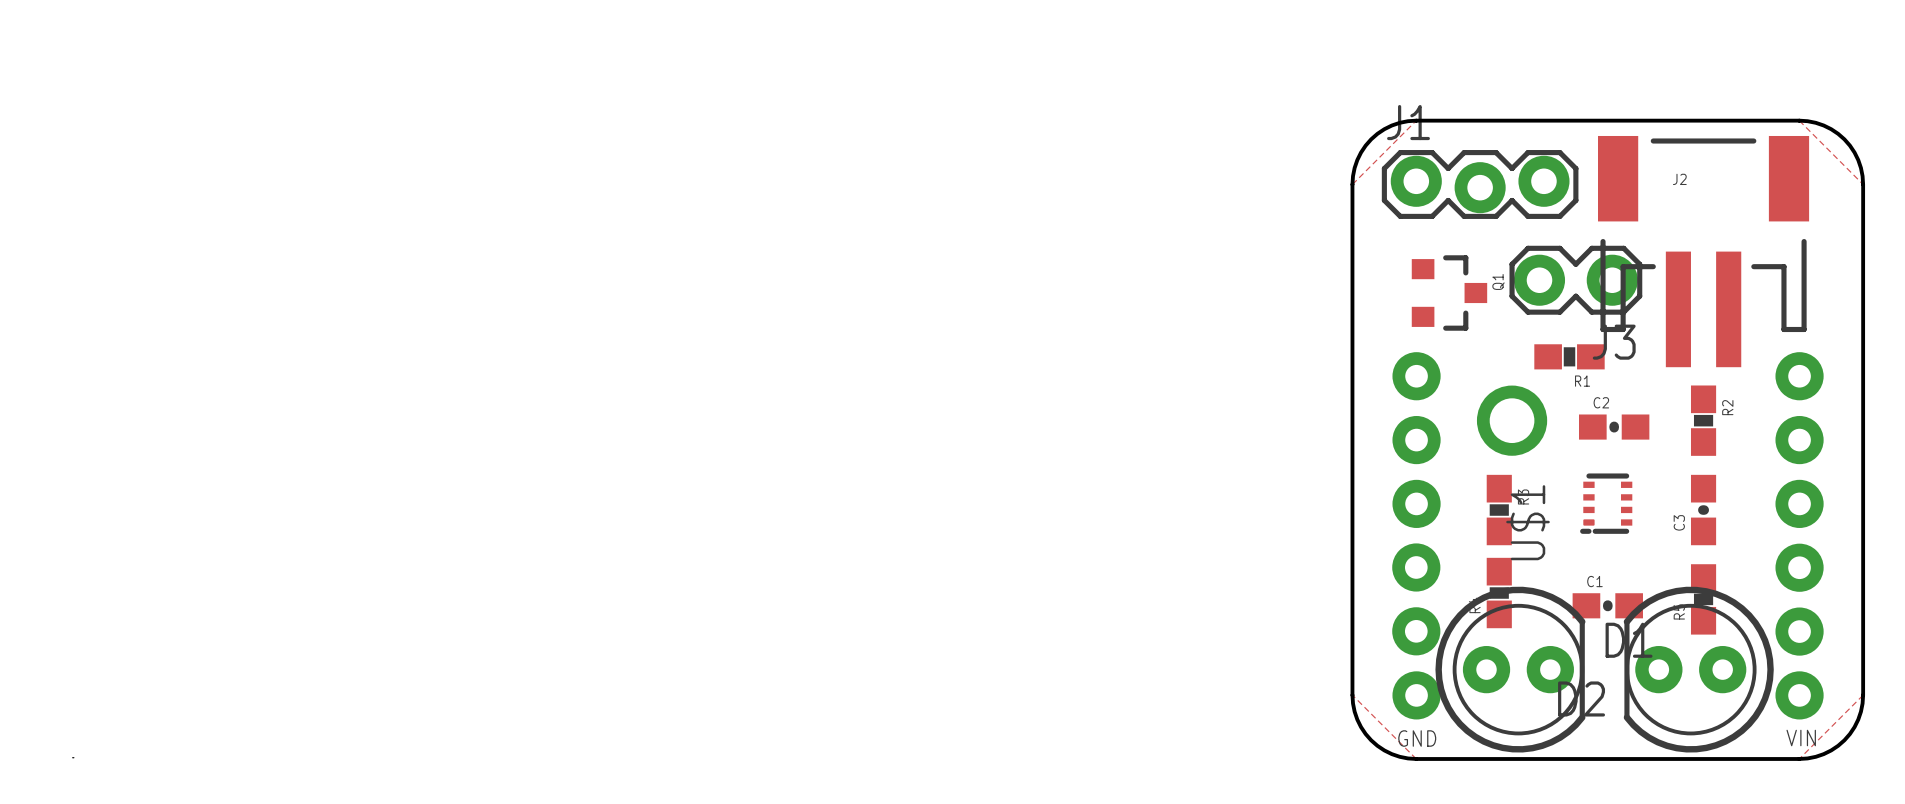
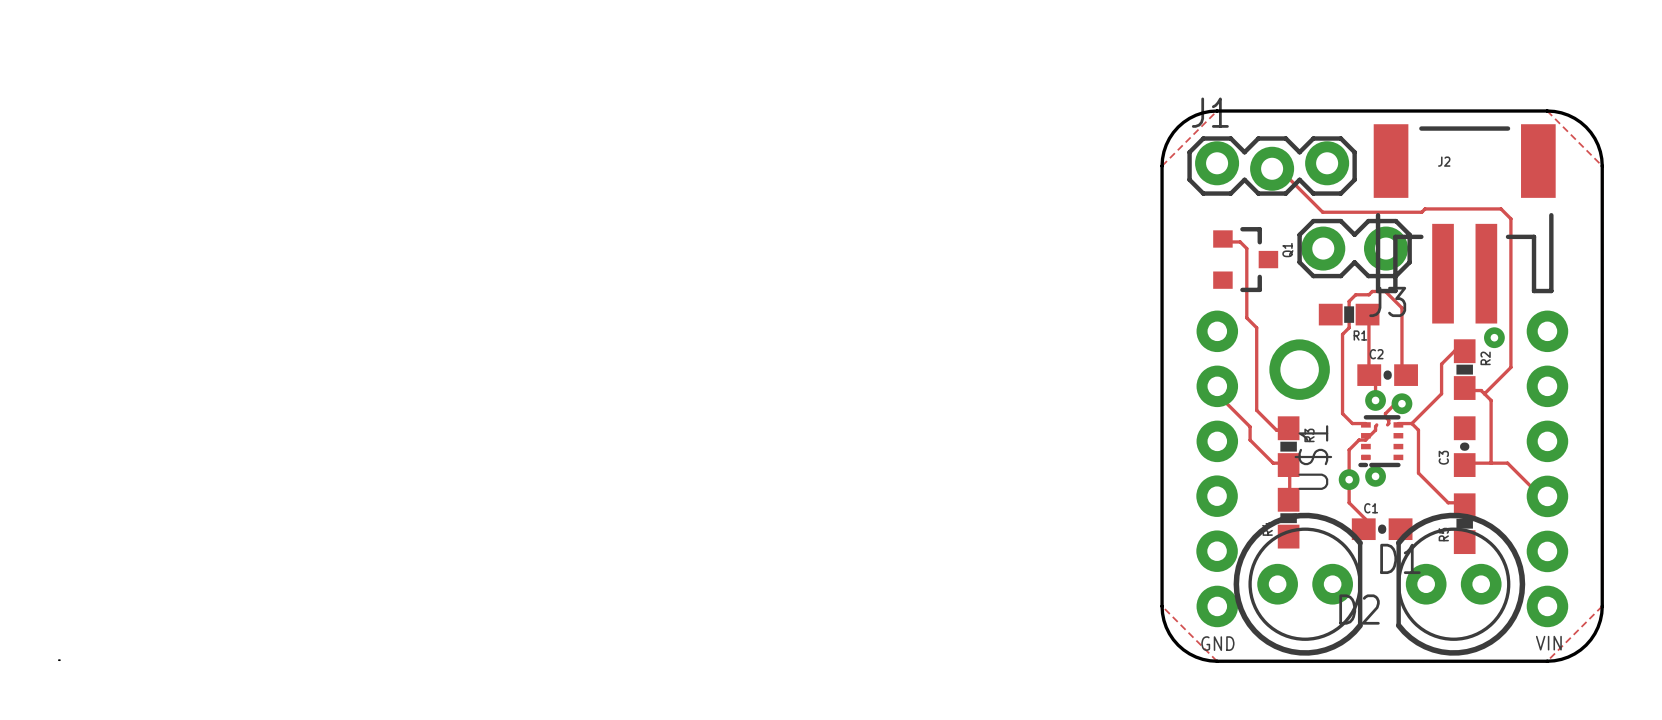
track: none -> (1272, 168) (1279, 169) (1322, 212) (1421, 212) (1425, 208) (1501, 208) (1510, 218) (1510, 367) (1484, 393)
track: none -> (1222, 238) (1223, 241) (1240, 241) (1246, 248) (1246, 317) (1256, 327) (1256, 410) (1276, 430) (1286, 430) (1288, 428)
track: none -> (1367, 314) (1368, 374) (1375, 380) (1375, 400)
via: none -> (1494, 337)
track: none -> (1464, 350) (1454, 350) (1441, 364) (1441, 393) (1411, 423)
track: none -> (1406, 375) (1401, 370) (1401, 307) (1385, 291) (1355, 294) (1349, 301) (1349, 327) (1342, 334) (1342, 413) (1352, 423) (1365, 424)
track: none -> (1217, 386) (1220, 387) (1220, 397) (1250, 426) (1250, 440) (1273, 463) (1286, 463) (1289, 466) (1288, 499)
track: none -> (1464, 388) (1464, 390) (1481, 390) (1491, 400) (1491, 463)
via: none -> (1375, 400)
track: none -> (1401, 403) (1395, 403) (1385, 413) (1388, 420) (1387, 424)
via: none -> (1401, 403)
track: none -> (1411, 423) (1398, 424)
track: none -> (1411, 423) (1418, 430) (1418, 473) (1448, 502) (1464, 502) (1464, 505)
track: none -> (1376, 424) (1375, 430) (1365, 440) (1359, 440) (1349, 449) (1349, 502) (1365, 519) (1365, 529) (1363, 529)
track: none -> (1464, 465) (1464, 463) (1507, 463) (1540, 496) (1547, 496)
via: none -> (1375, 476)
via: none -> (1349, 479)

